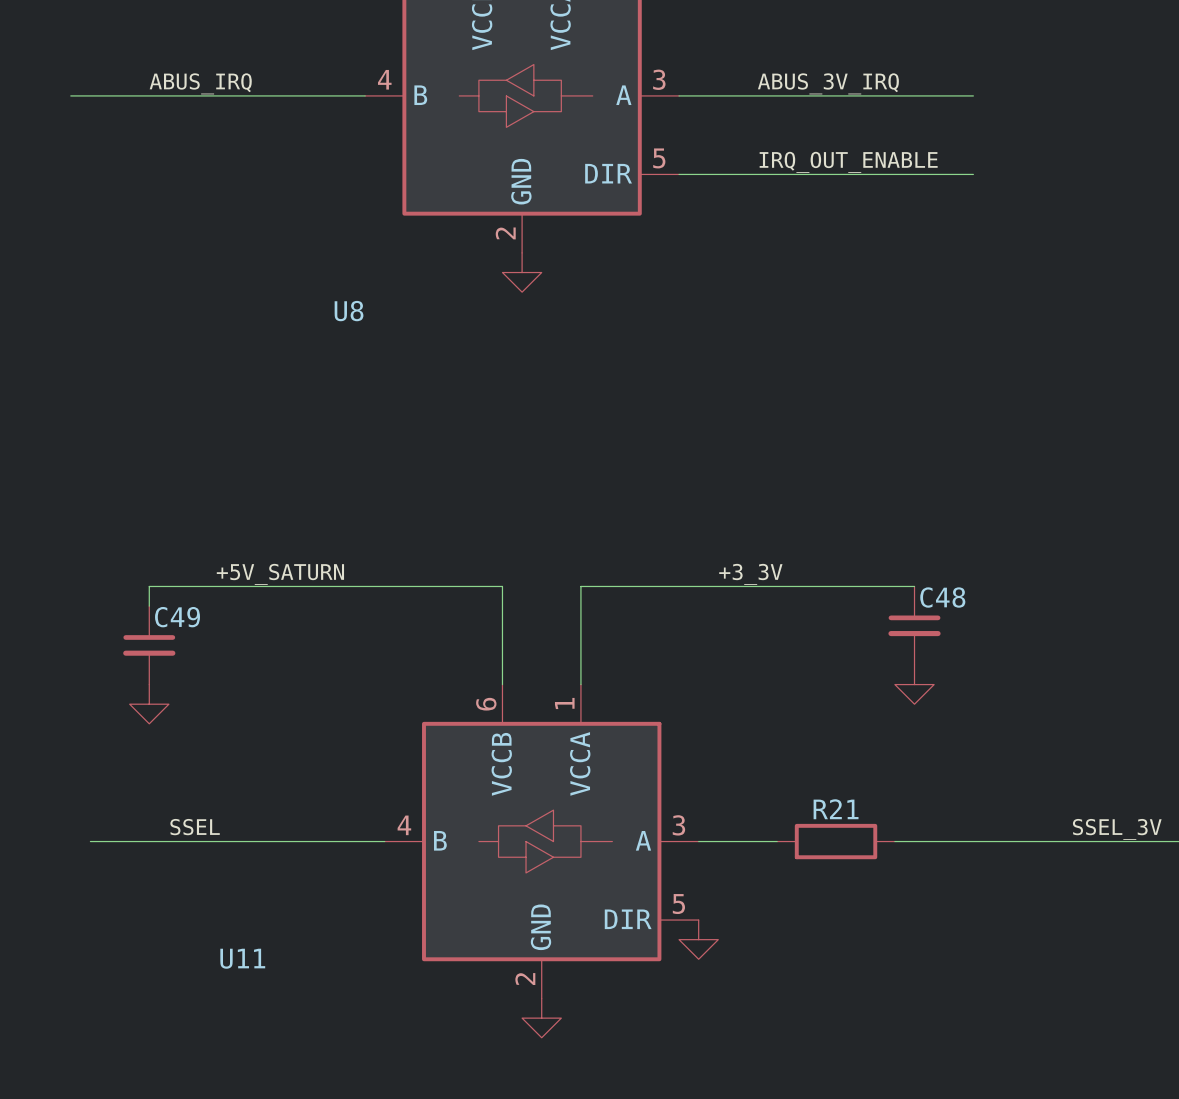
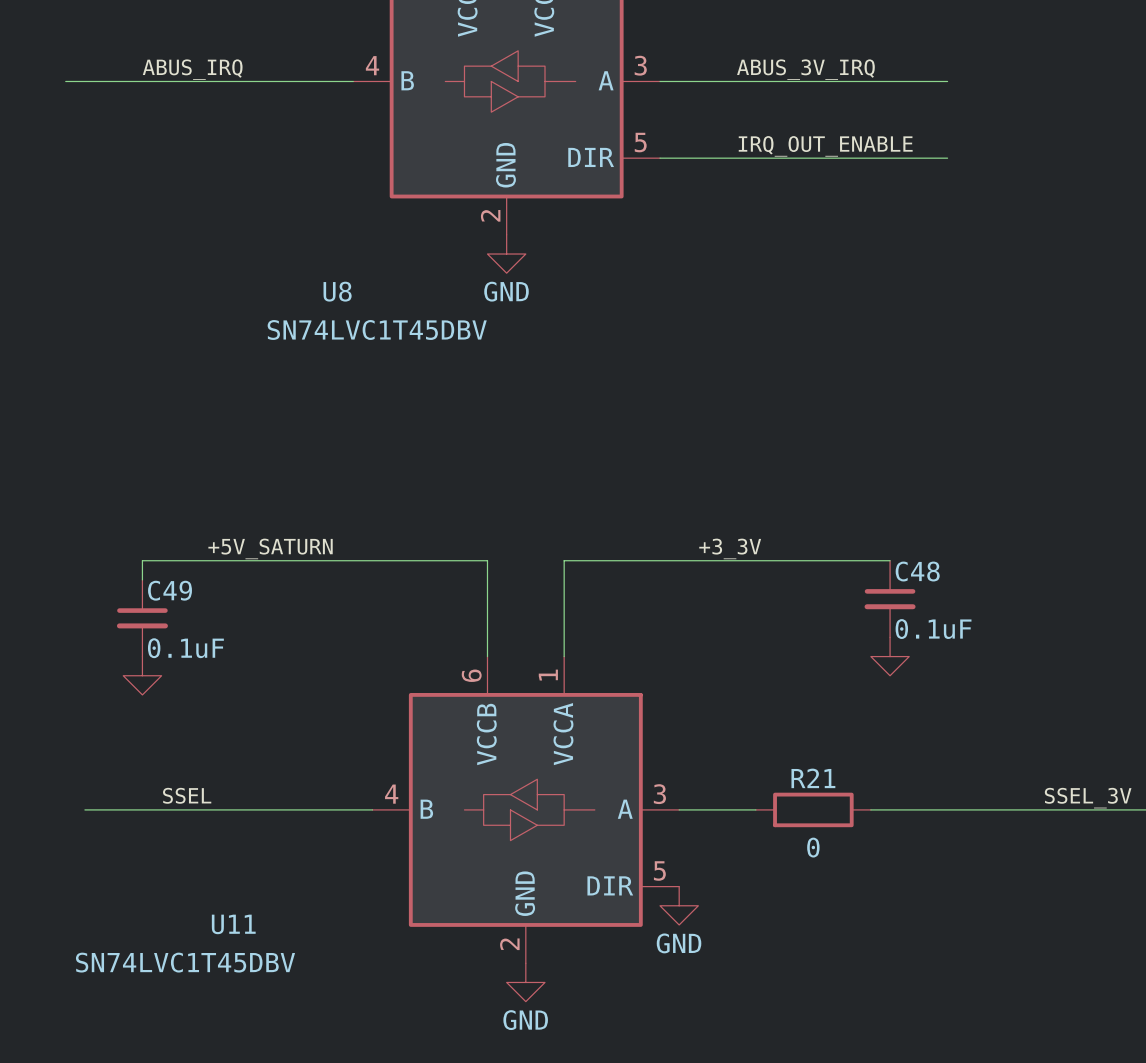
power symbol text: none -> GND (506, 291)
U8 value: none -> SN74LVC1T45DBV (377, 329)
C48 value: none -> 0.1uF (933, 629)
C49 value: none -> 0.1uF (185, 648)
R21 value: none -> 0 (813, 847)
power symbol text: none -> GND (679, 943)
U11 value: none -> SN74LVC1T45DBV (185, 962)
power symbol text: none -> GND (525, 1020)

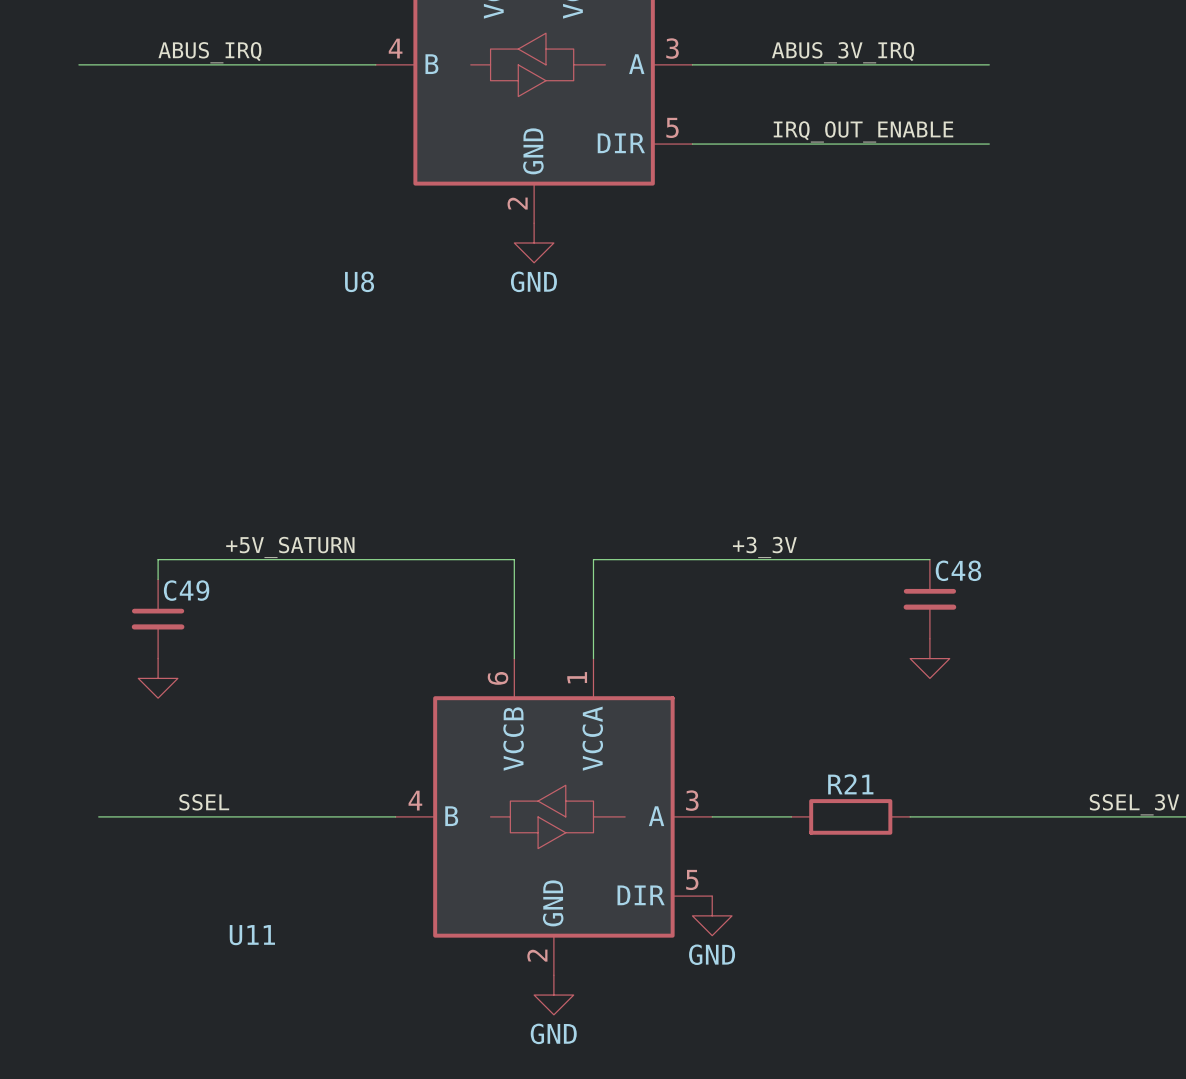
U8 value: SN74LVC1T45DBV (377, 329) -> none
C48 value: 0.1uF (933, 629) -> none
C49 value: 0.1uF (185, 648) -> none
R21 value: 0 (813, 847) -> none
U11 value: SN74LVC1T45DBV (185, 962) -> none

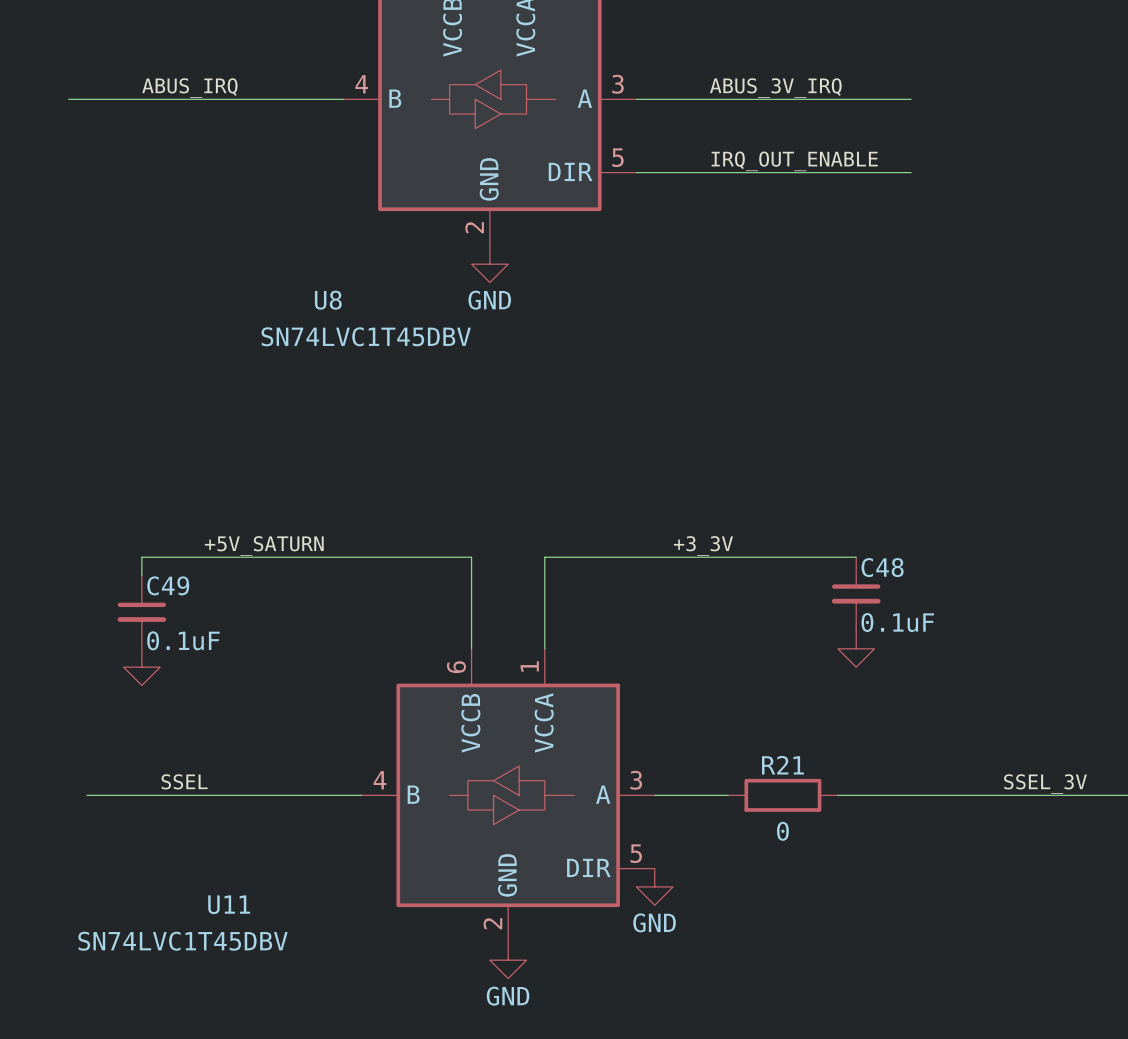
U8 value: none -> SN74LVC1T45DBV (366, 336)
C48 value: none -> 0.1uF (897, 622)
C49 value: none -> 0.1uF (183, 640)
R21 value: none -> 0 (782, 831)
U11 value: none -> SN74LVC1T45DBV (183, 941)

